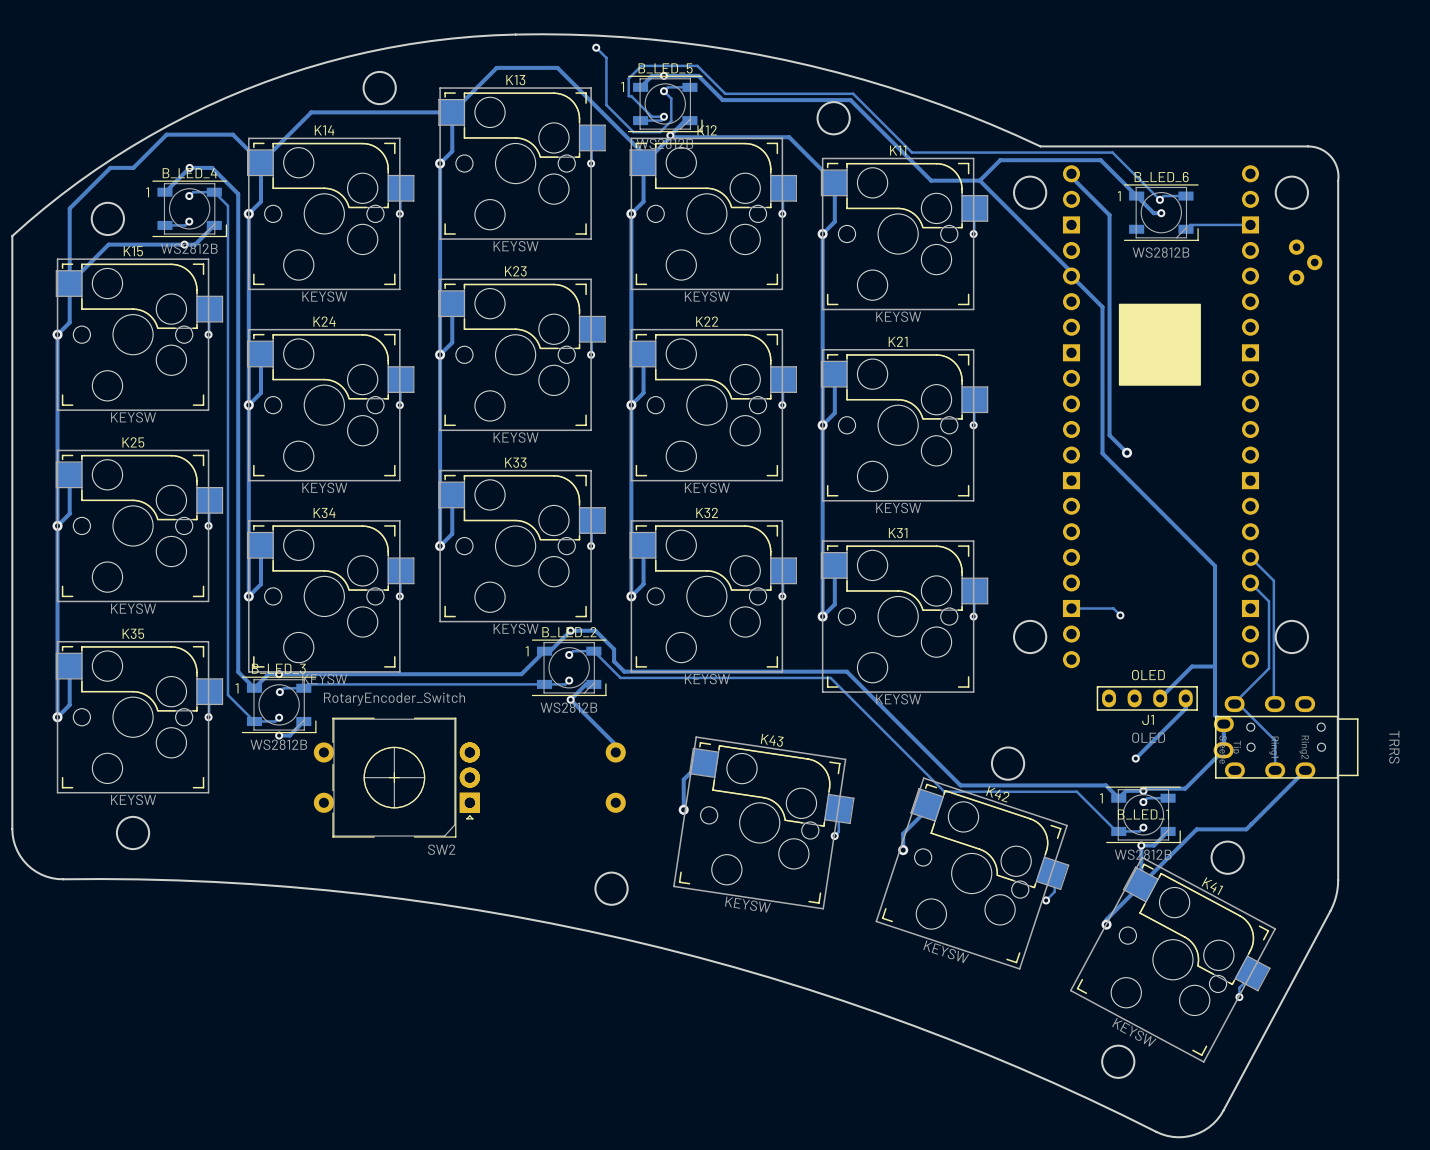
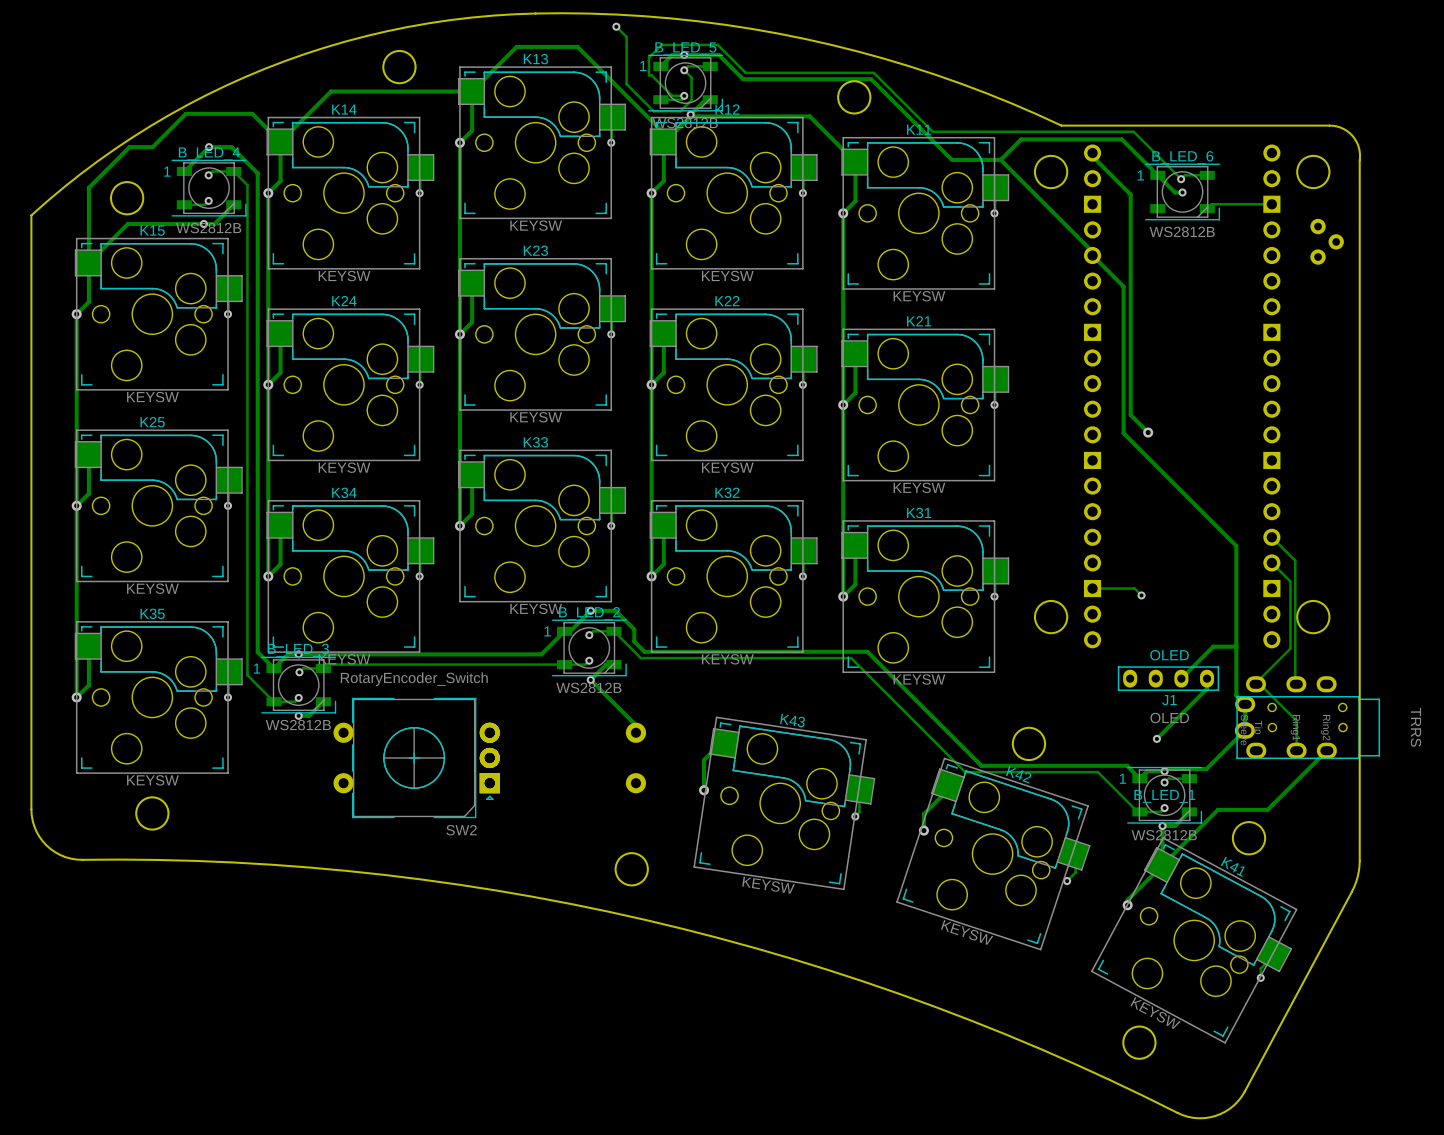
drawing: [1118, 303, 1201, 386] -> none

